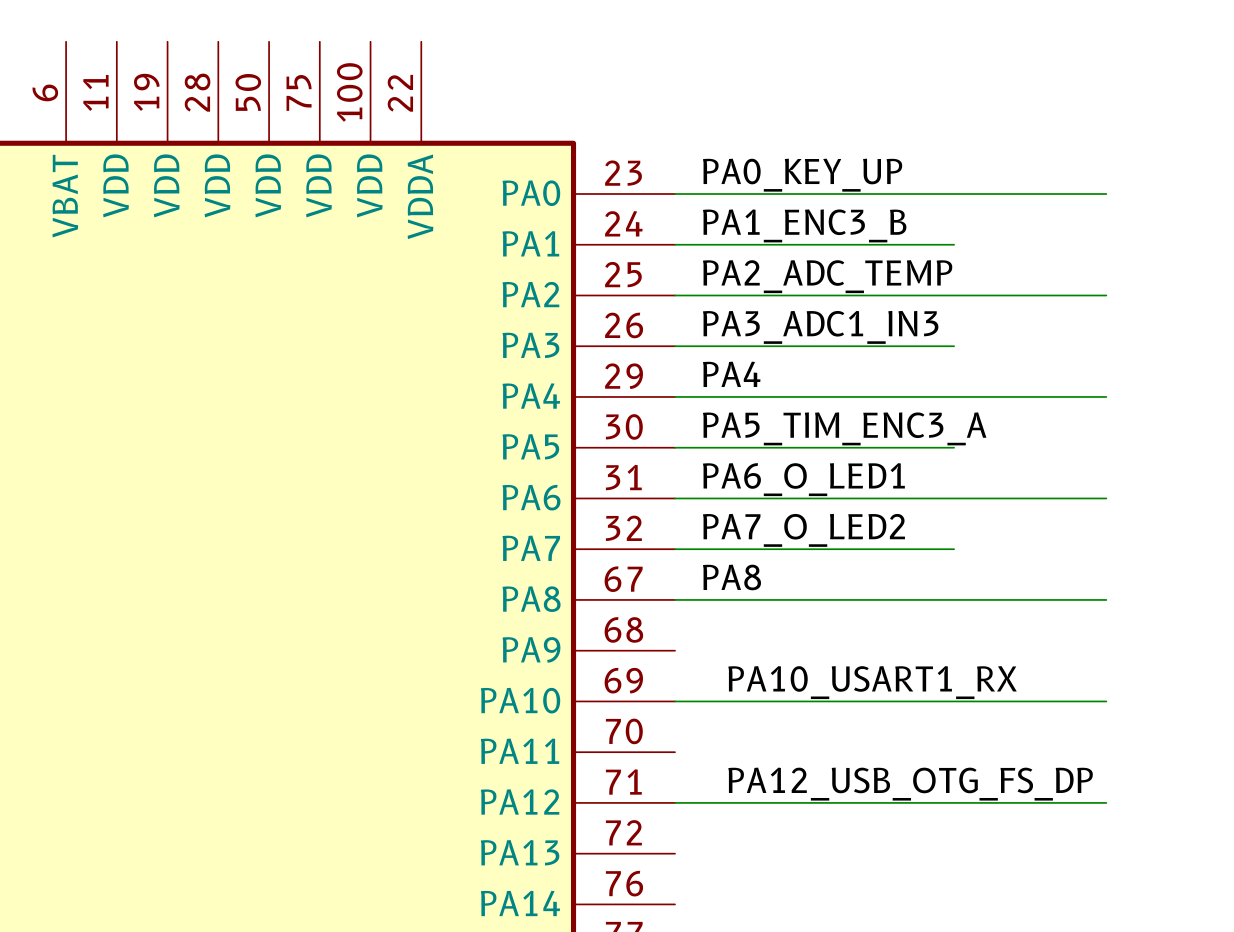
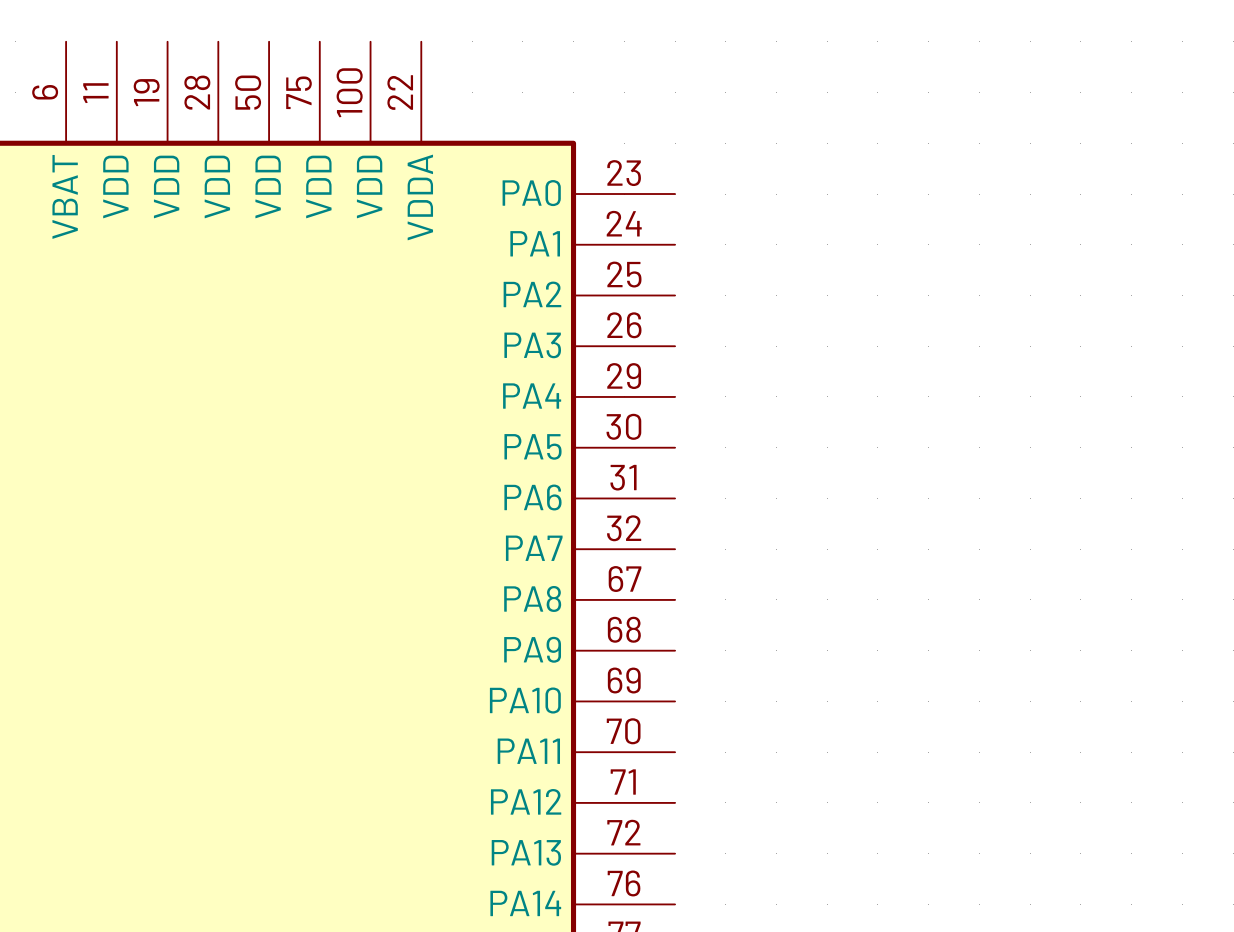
label: PA0_KEY_UP (802, 175) -> none
wire: (675, 194) (1106, 194) -> none
label: PA1_ENC3_B (804, 225) -> none
wire: (675, 244) (954, 244) -> none
label: PA2_ADC_TEMP (827, 276) -> none
wire: (675, 295) (1106, 295) -> none
label: PA3_ADC1_IN3 (820, 327) -> none
wire: (675, 346) (954, 346) -> none
label: PA4 (731, 374) -> none
wire: (675, 396) (1106, 396) -> none
label: PA5_TIM_ENC3_A (844, 428) -> none
wire: (675, 447) (954, 447) -> none
label: PA6_O_LED1 (803, 479) -> none
wire: (675, 498) (1106, 498) -> none
label: PA7_O_LED2 (803, 530) -> none
wire: (675, 549) (954, 549) -> none
label: PA8 (731, 577) -> none
wire: (675, 599) (1106, 599) -> none
label: PA10_USART1_RX (872, 682) -> none
wire: (675, 701) (1106, 701) -> none
label: PA12_USB_OTG_FS_DP (910, 784) -> none
wire: (675, 802) (1106, 802) -> none

